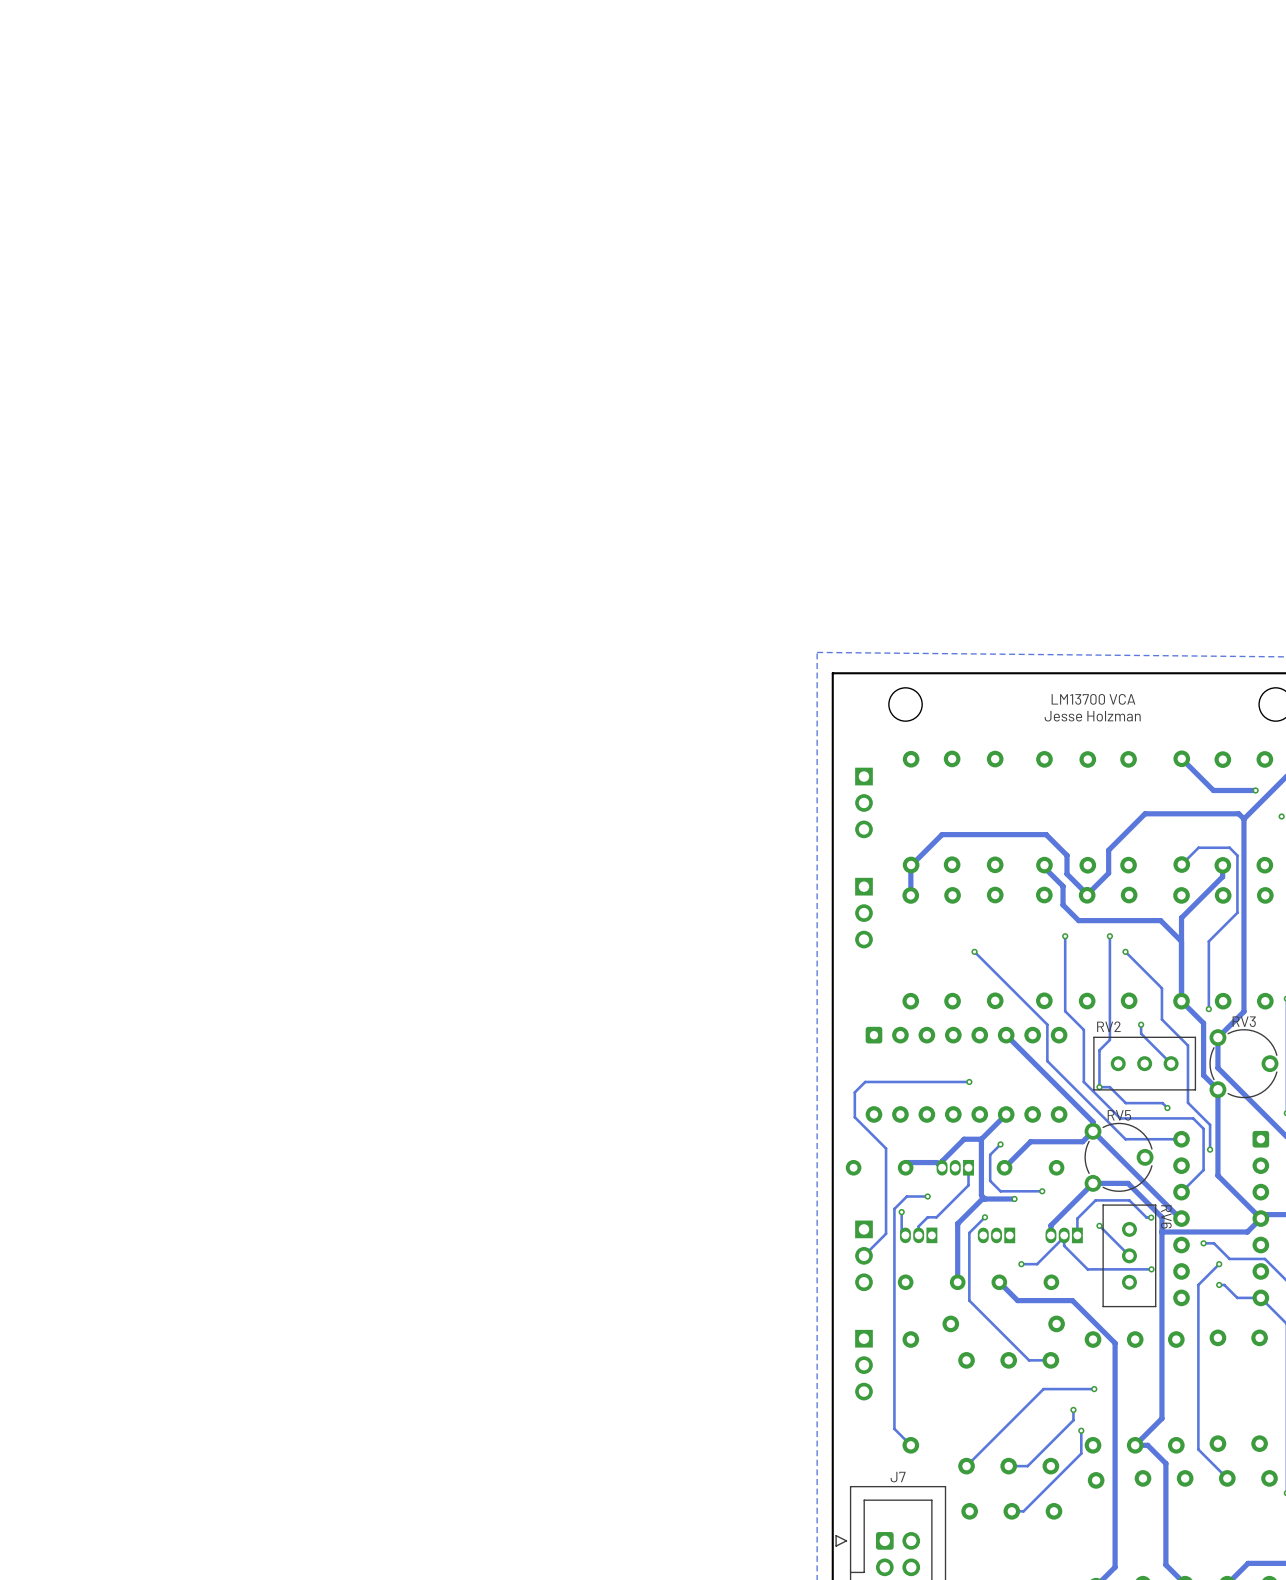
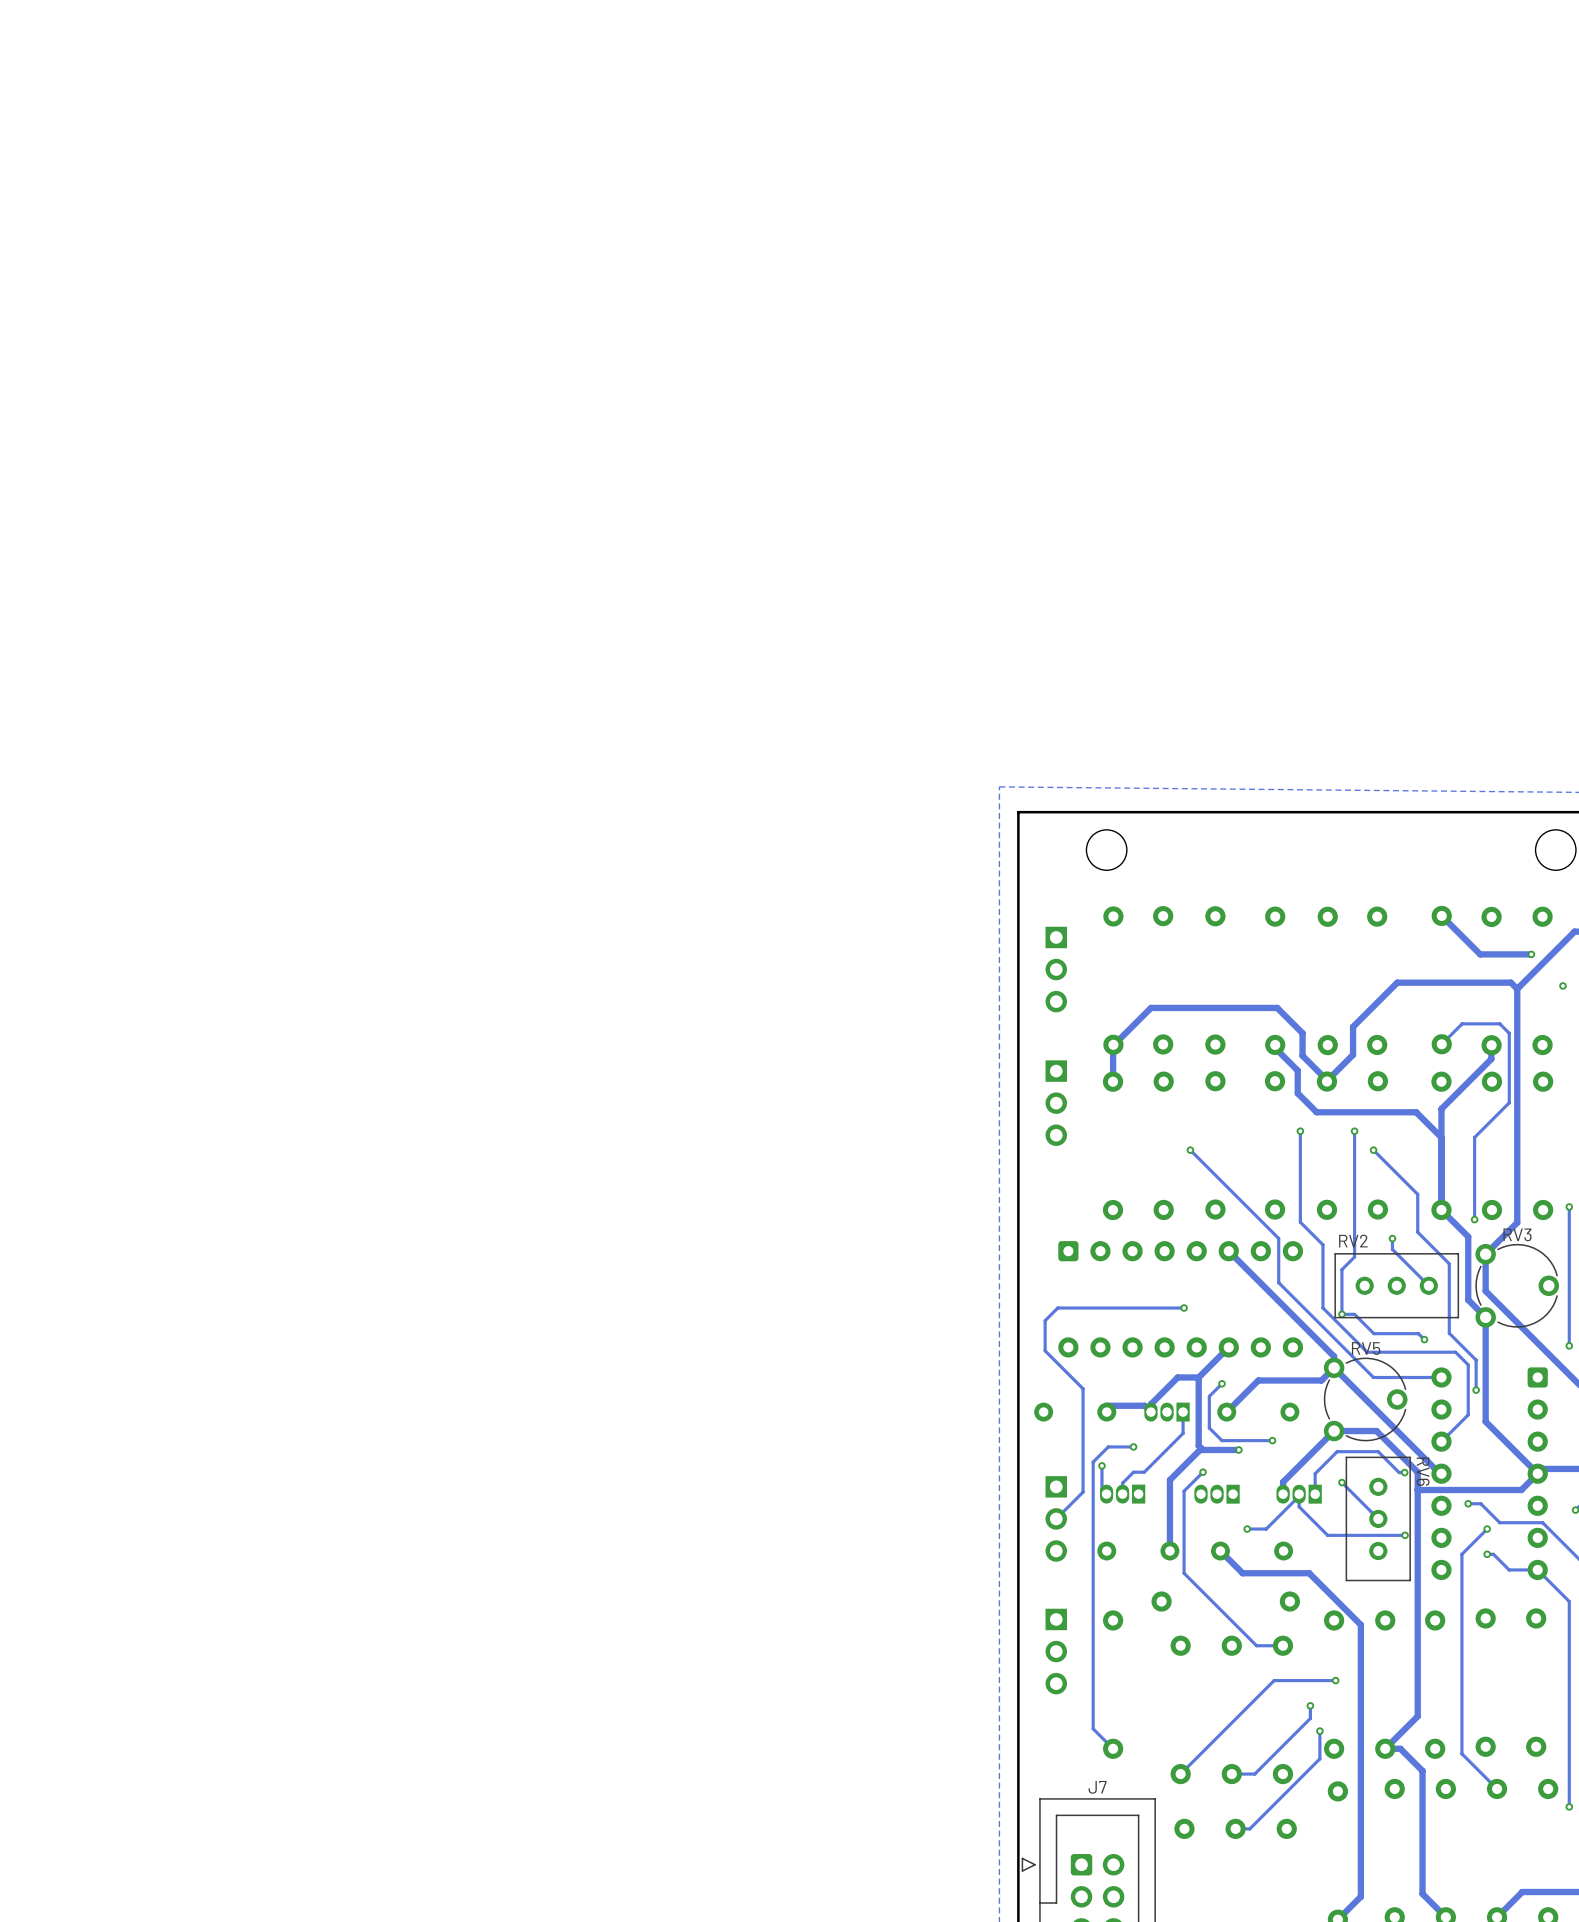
text: LM13700 VCA (1093, 699) -> none
text: Jesse Holzman (1092, 716) -> none

